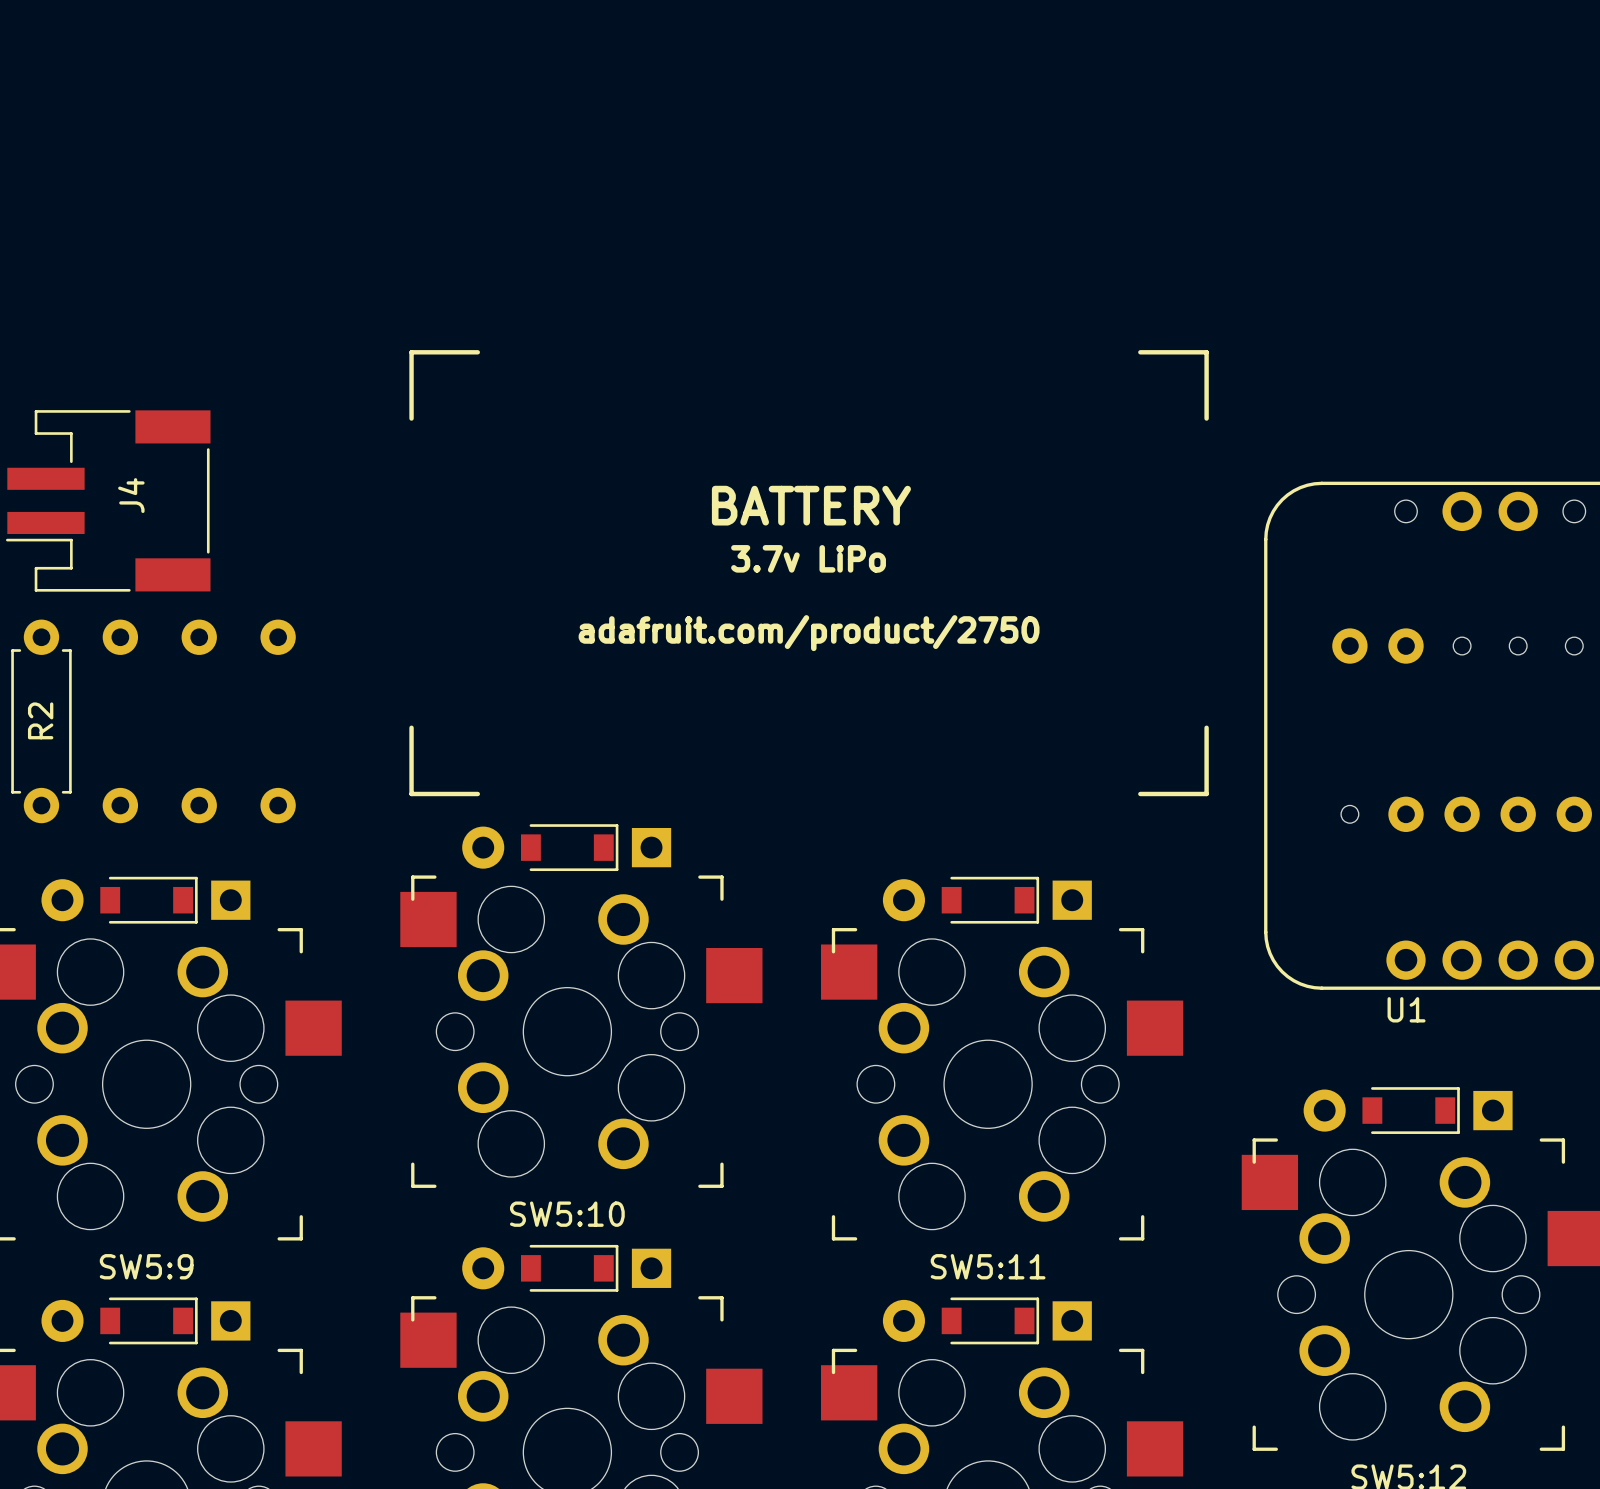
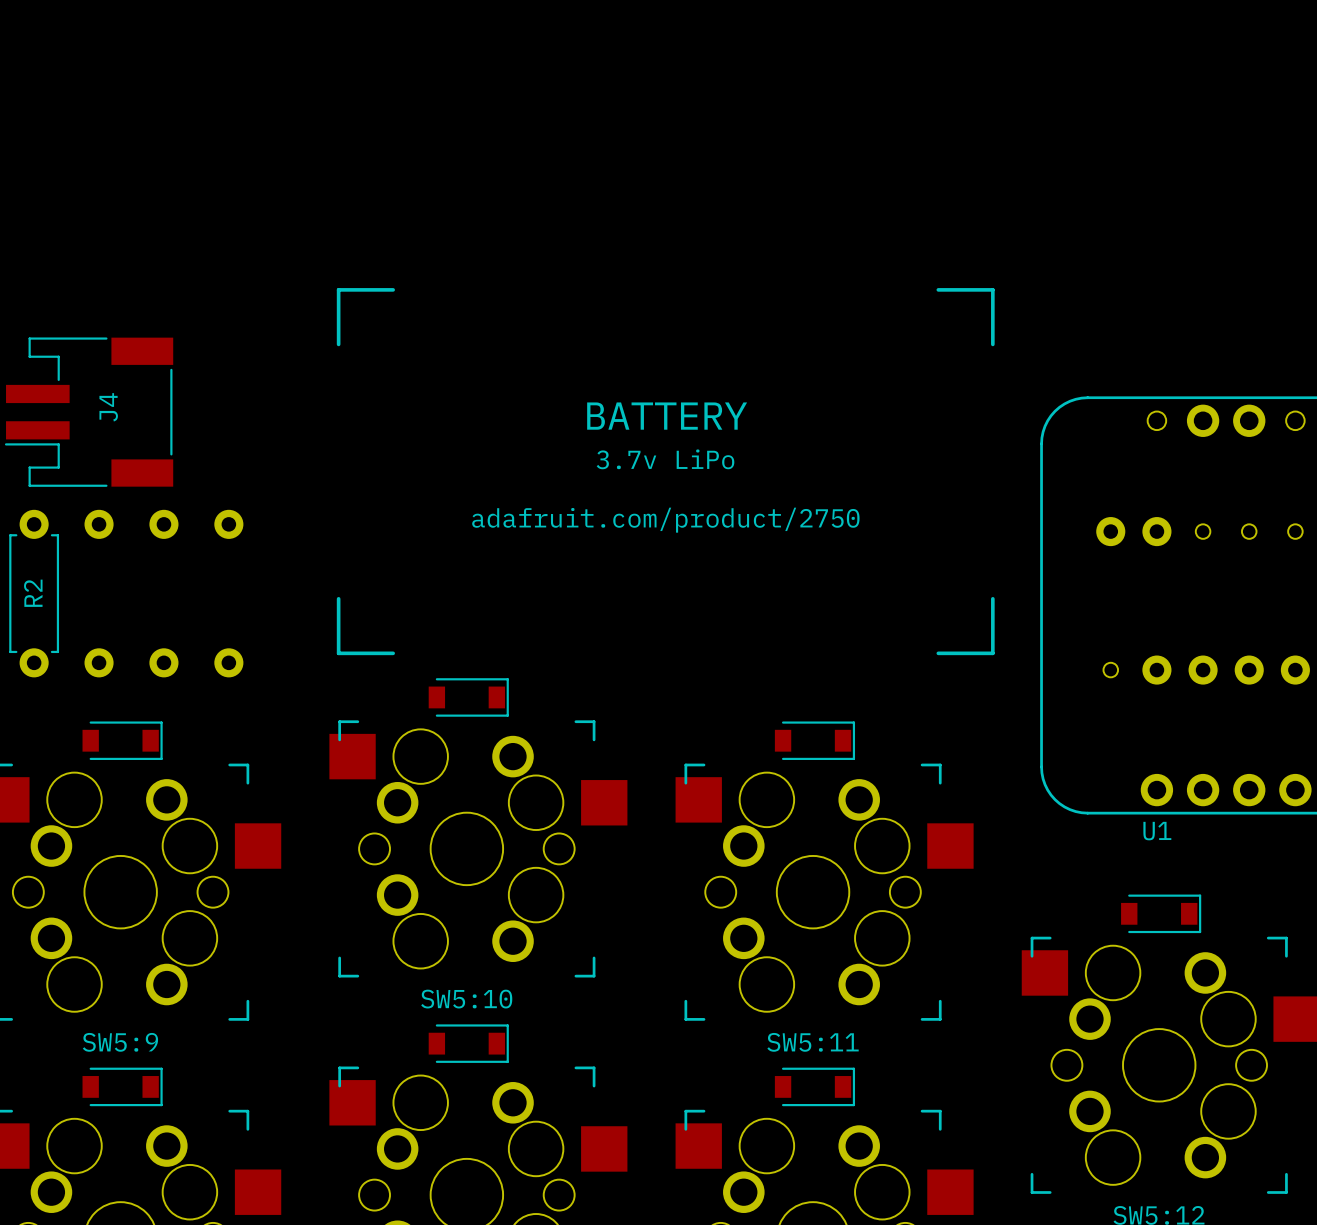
part footprint: [462, 824, 672, 872] -> [428, 678, 509, 717]
part footprint: [41, 876, 251, 924] -> [82, 721, 163, 761]
part footprint: [882, 876, 1092, 924] -> [774, 721, 856, 761]
part footprint: [1303, 1087, 1513, 1134] -> [1121, 894, 1202, 934]
part footprint: [462, 1244, 672, 1292] -> [428, 1024, 509, 1063]
part footprint: [41, 1297, 251, 1345] -> [82, 1067, 163, 1107]
part footprint: [882, 1297, 1092, 1345] -> [774, 1067, 856, 1107]

